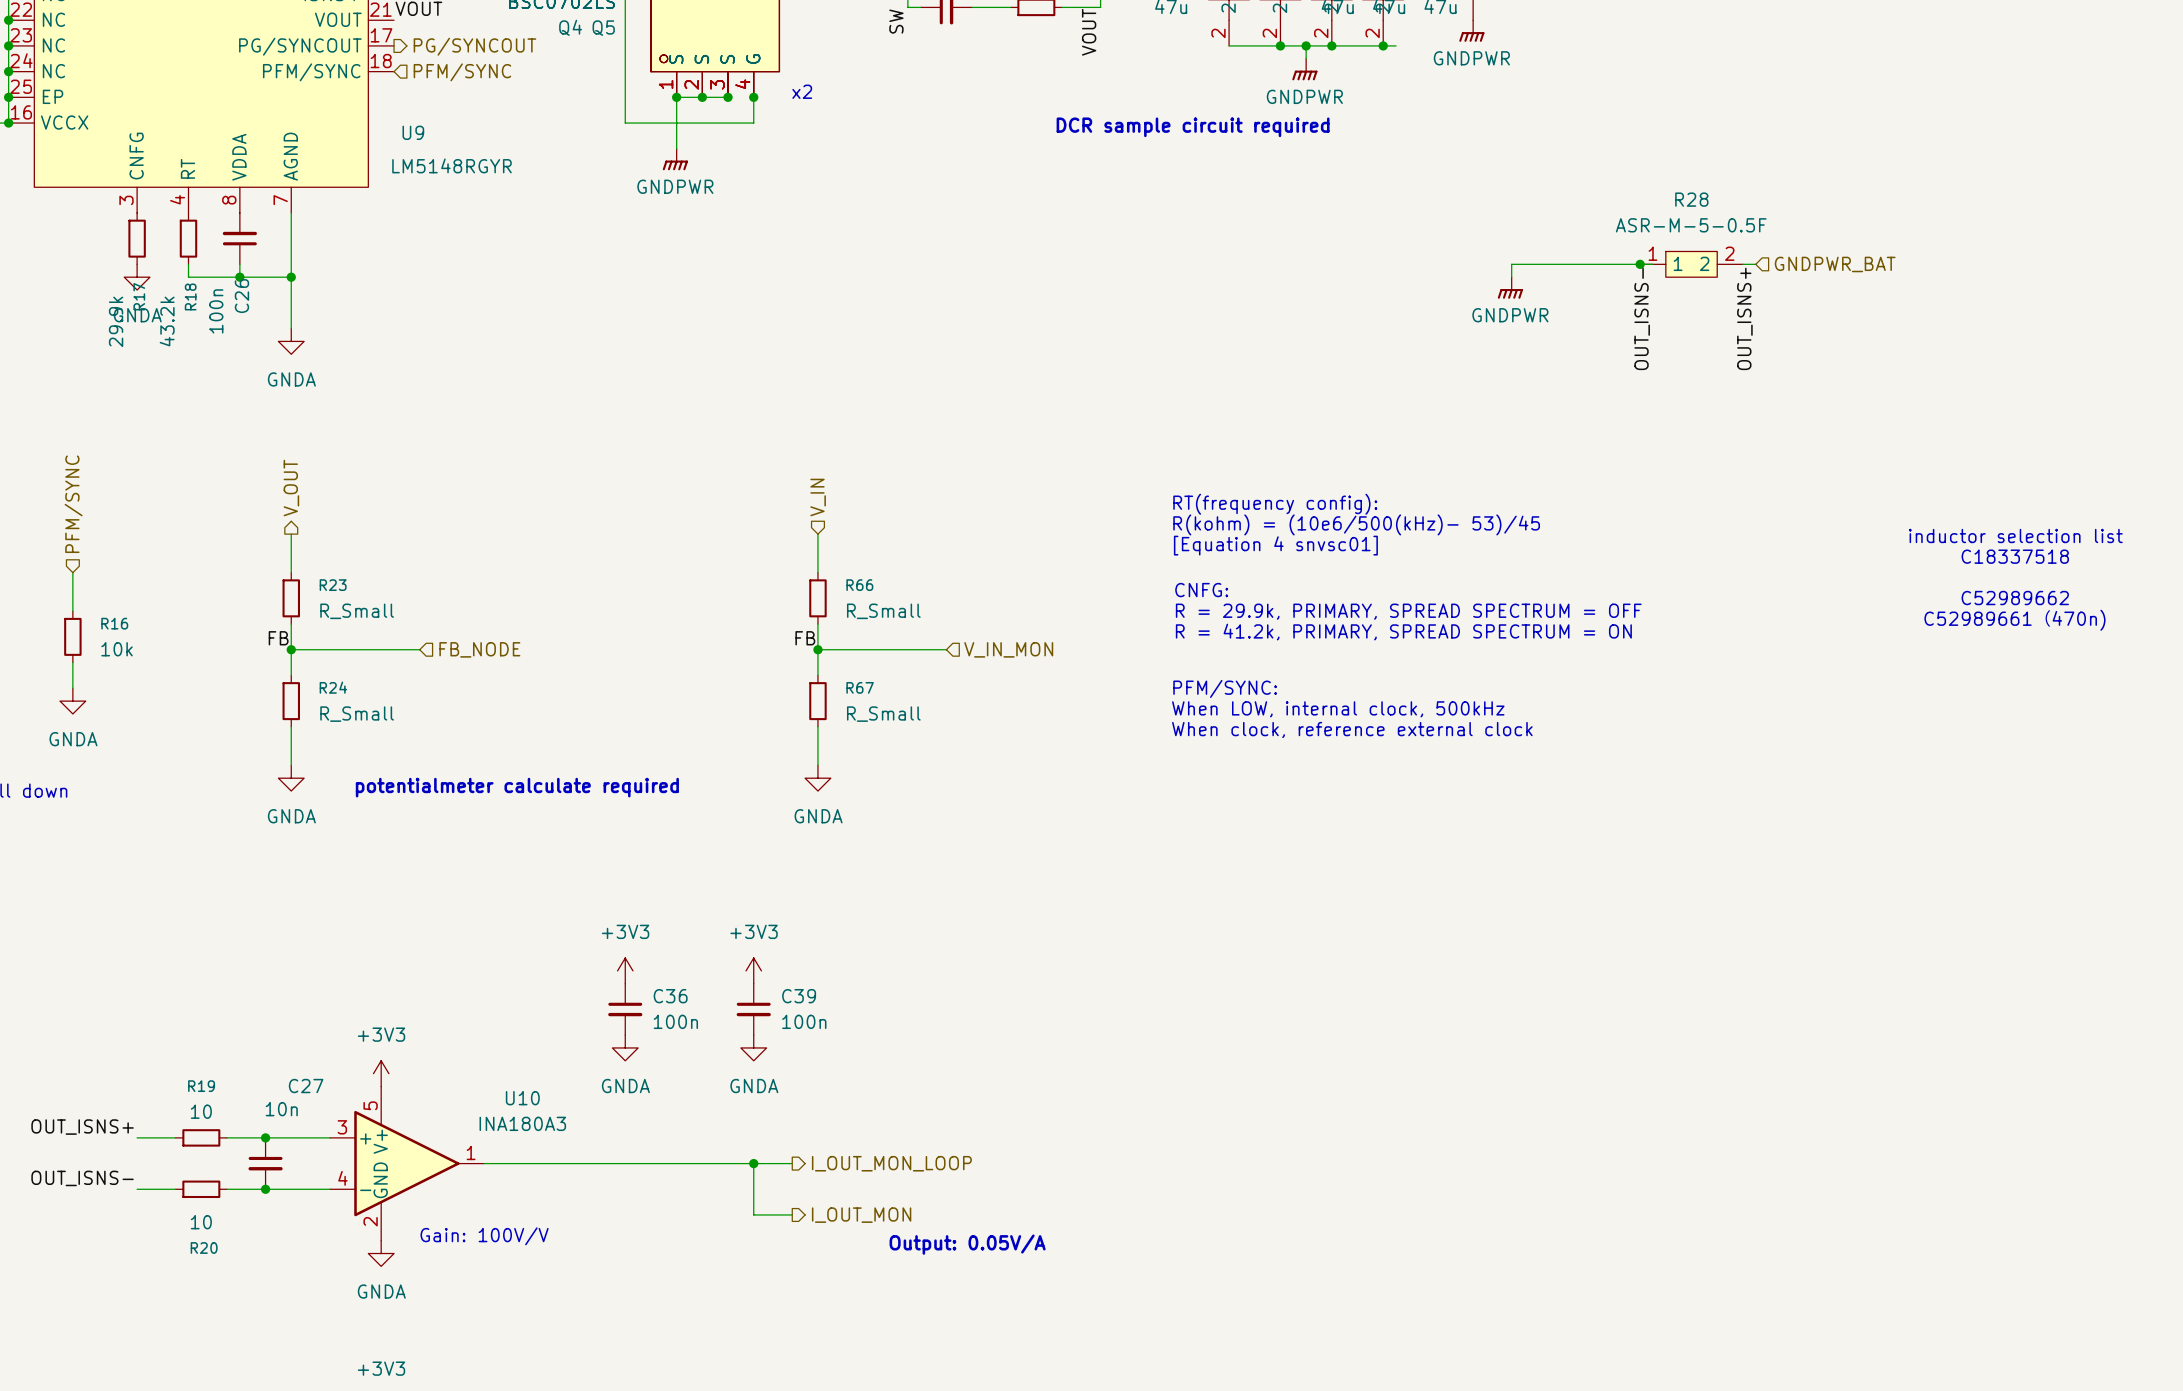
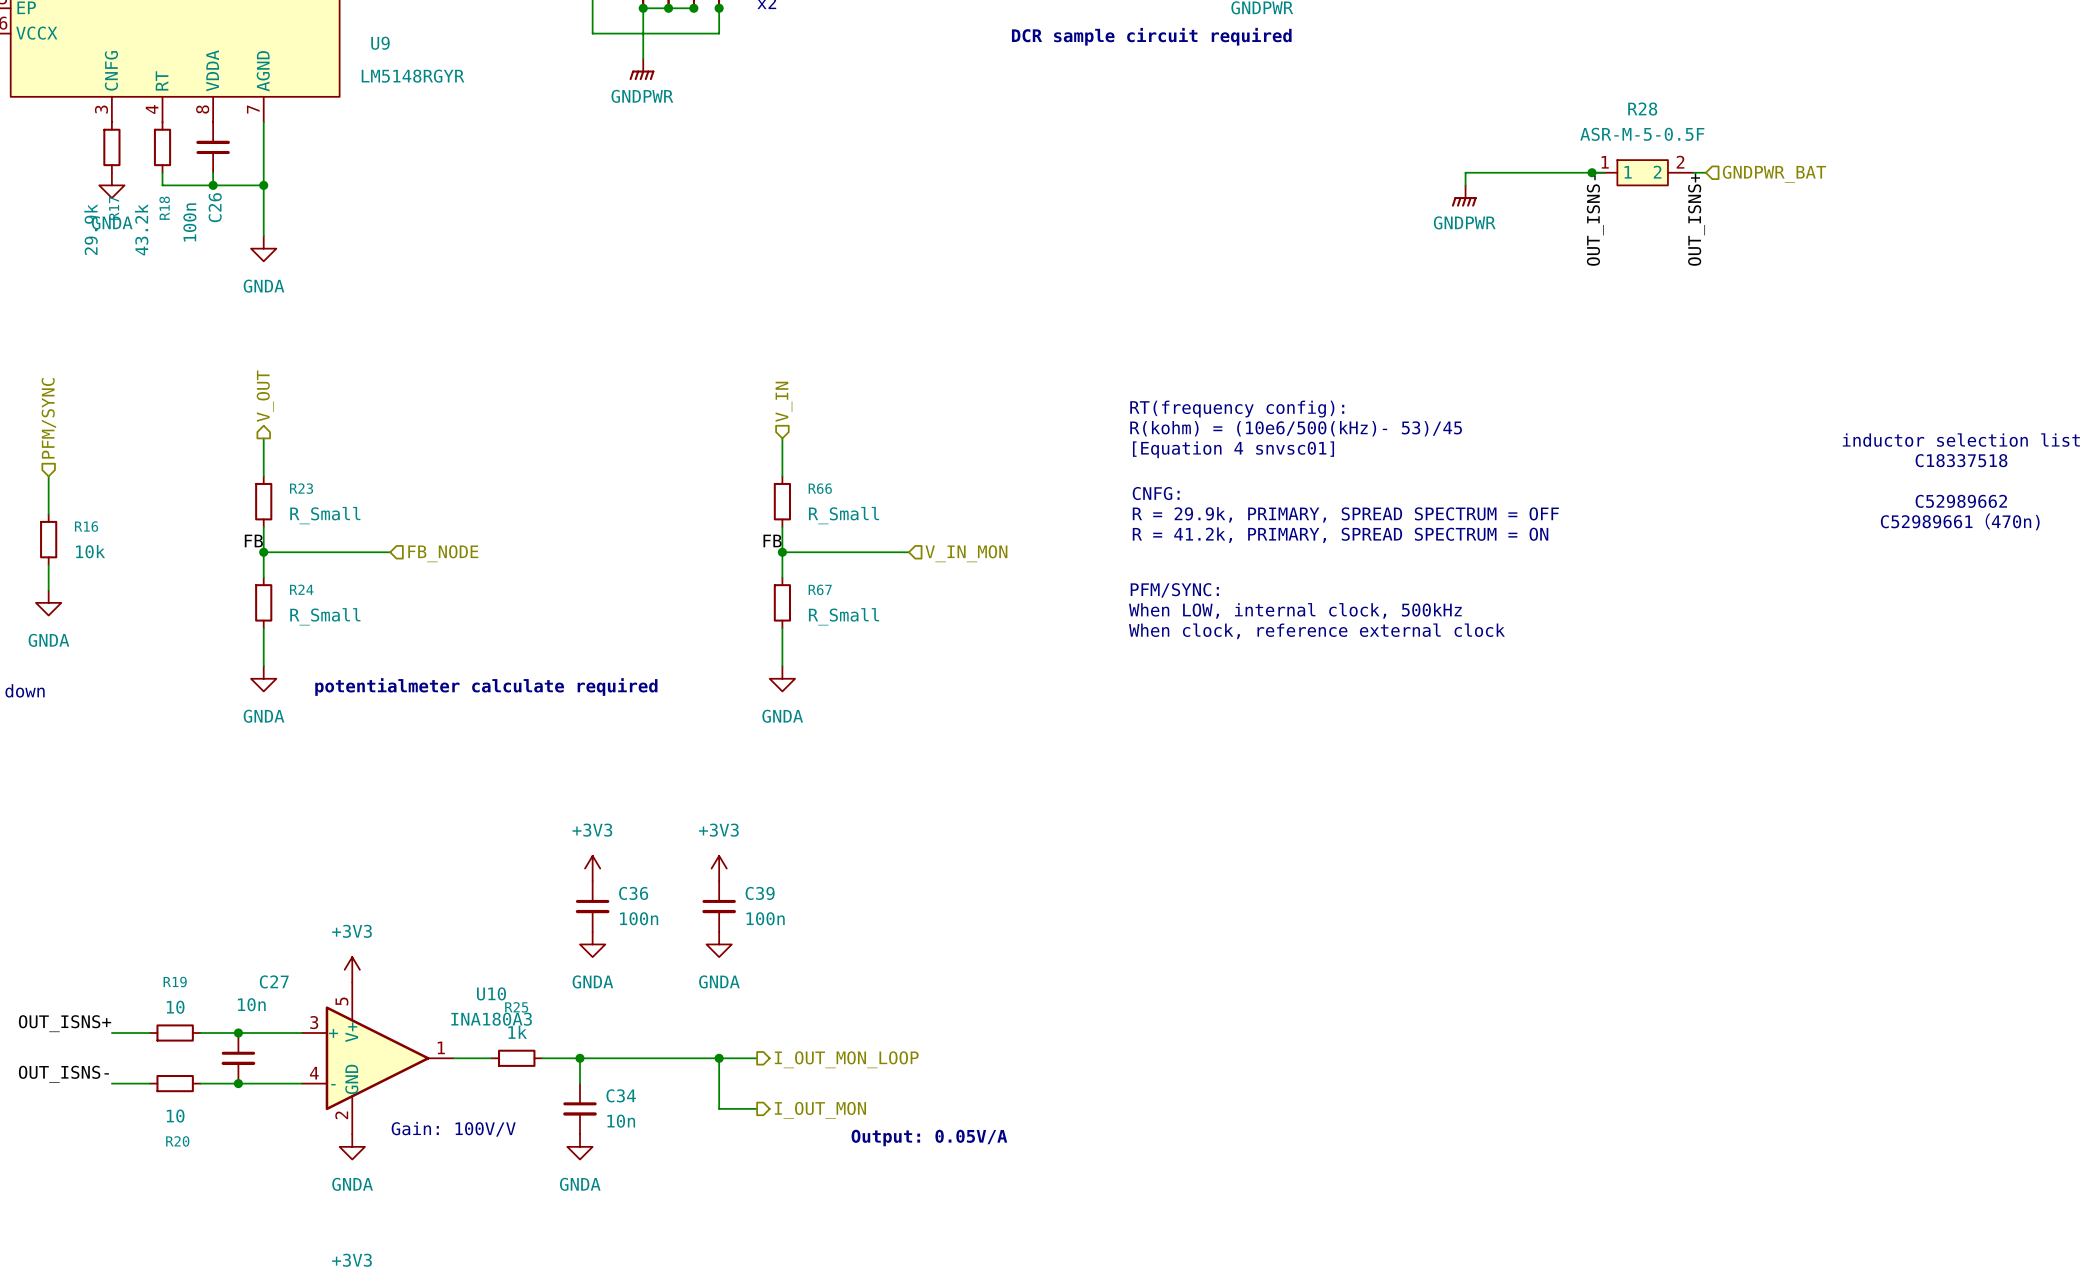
wire: (522, 1163) (573, 1163) -> none
R25: none -> 1k (516, 1058)
wire: none -> (579, 1058) (579, 1083)
junction: none -> (579, 1058)
C34: none -> 10n (579, 1108)
power symbol: none -> GNDA (579, 1146)

